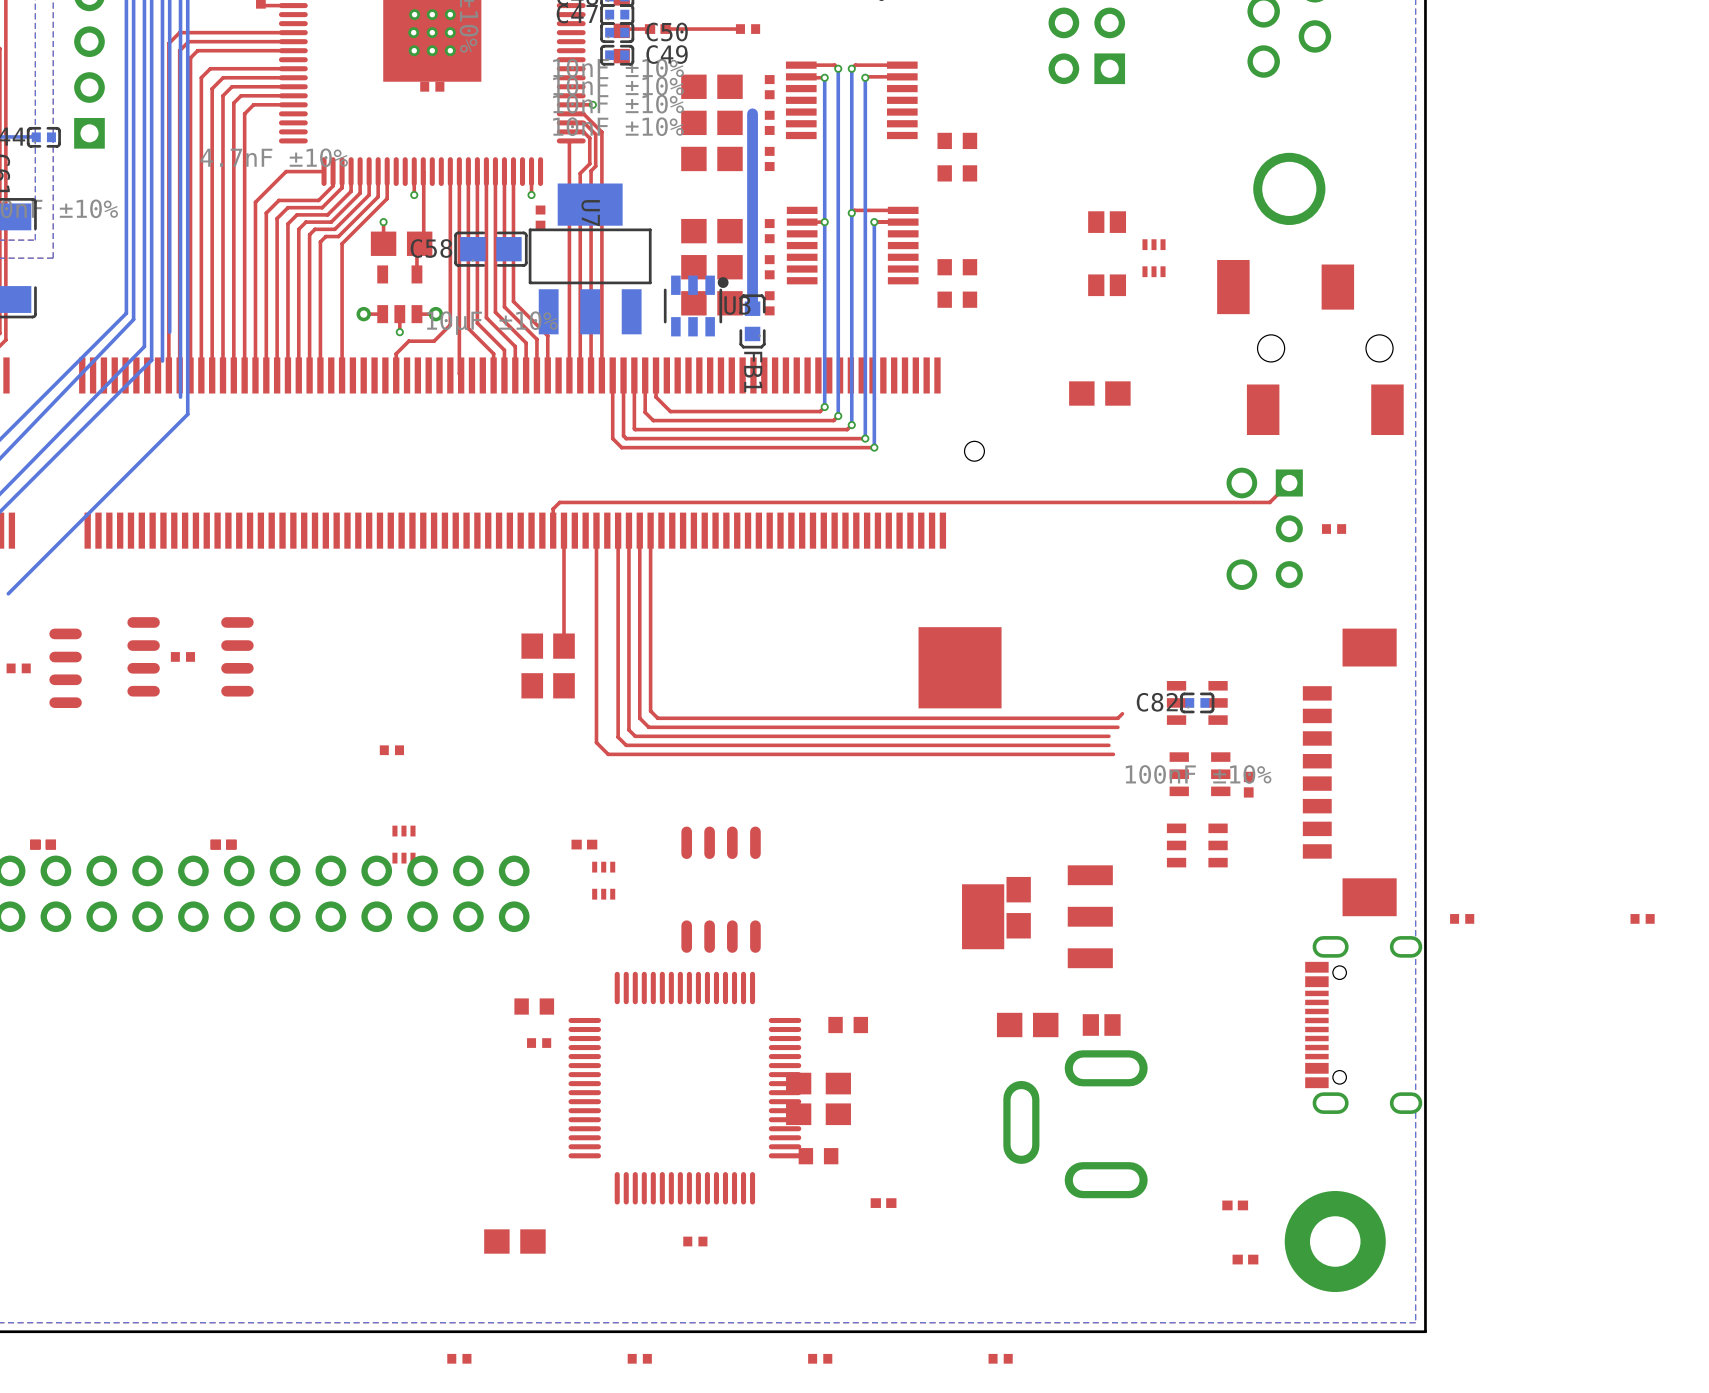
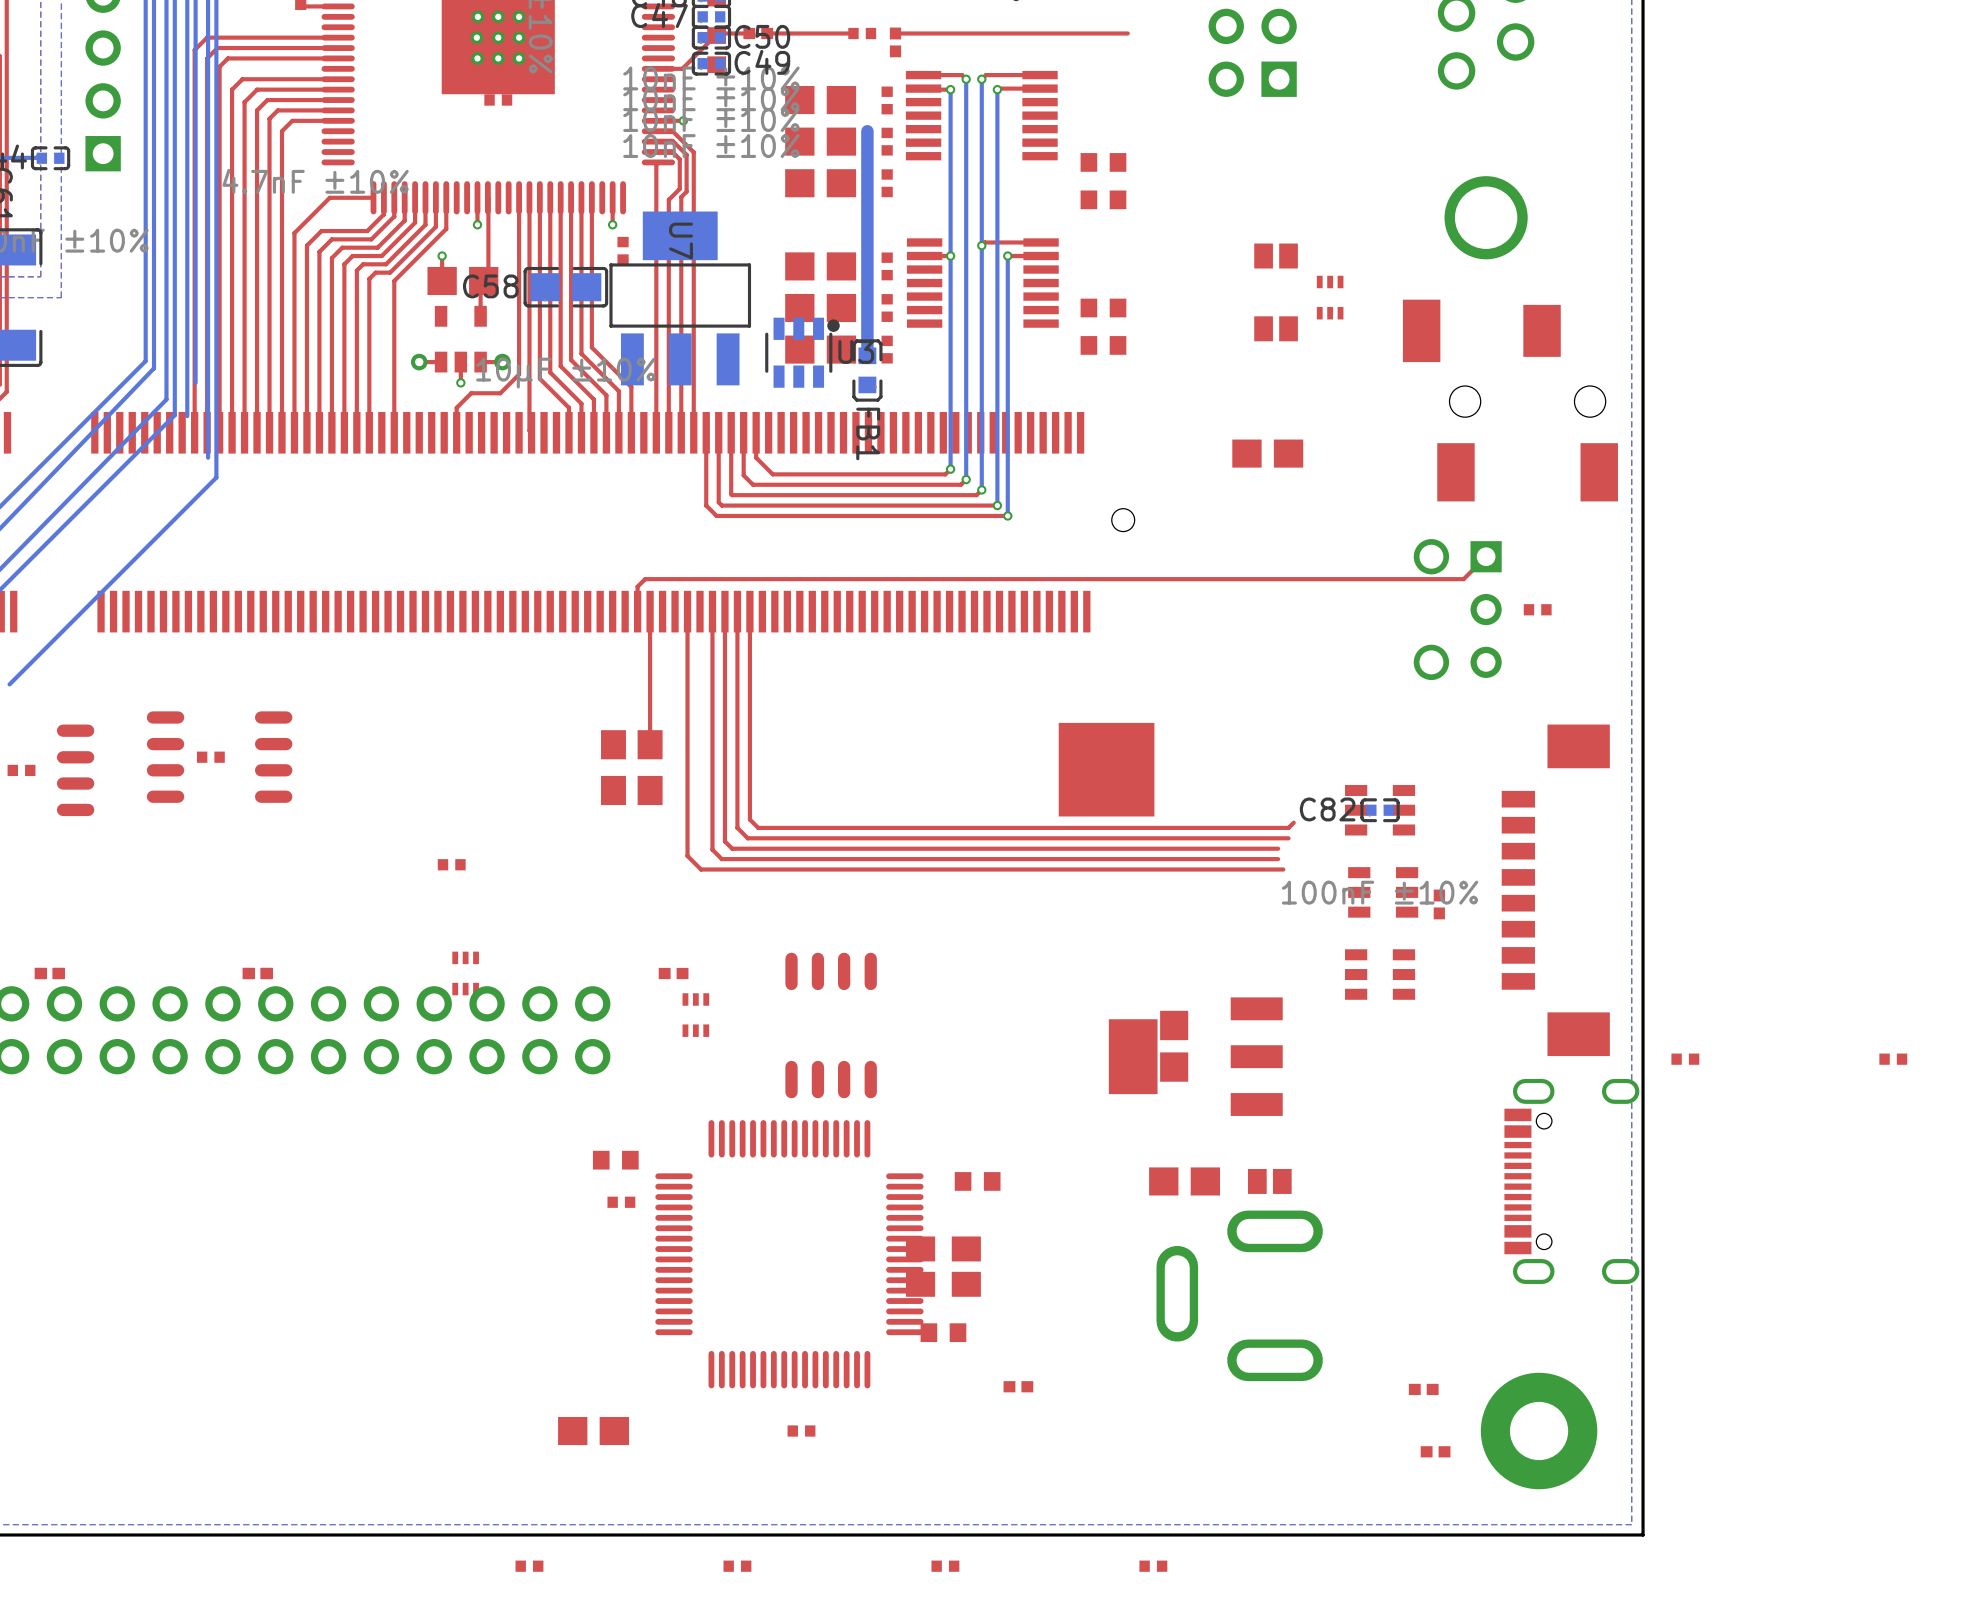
top track: none -> (1127, 33) (895, 33)
top track: none -> (716, 35) (682, 68) (658, 68)
part: none -> (895, 42)

